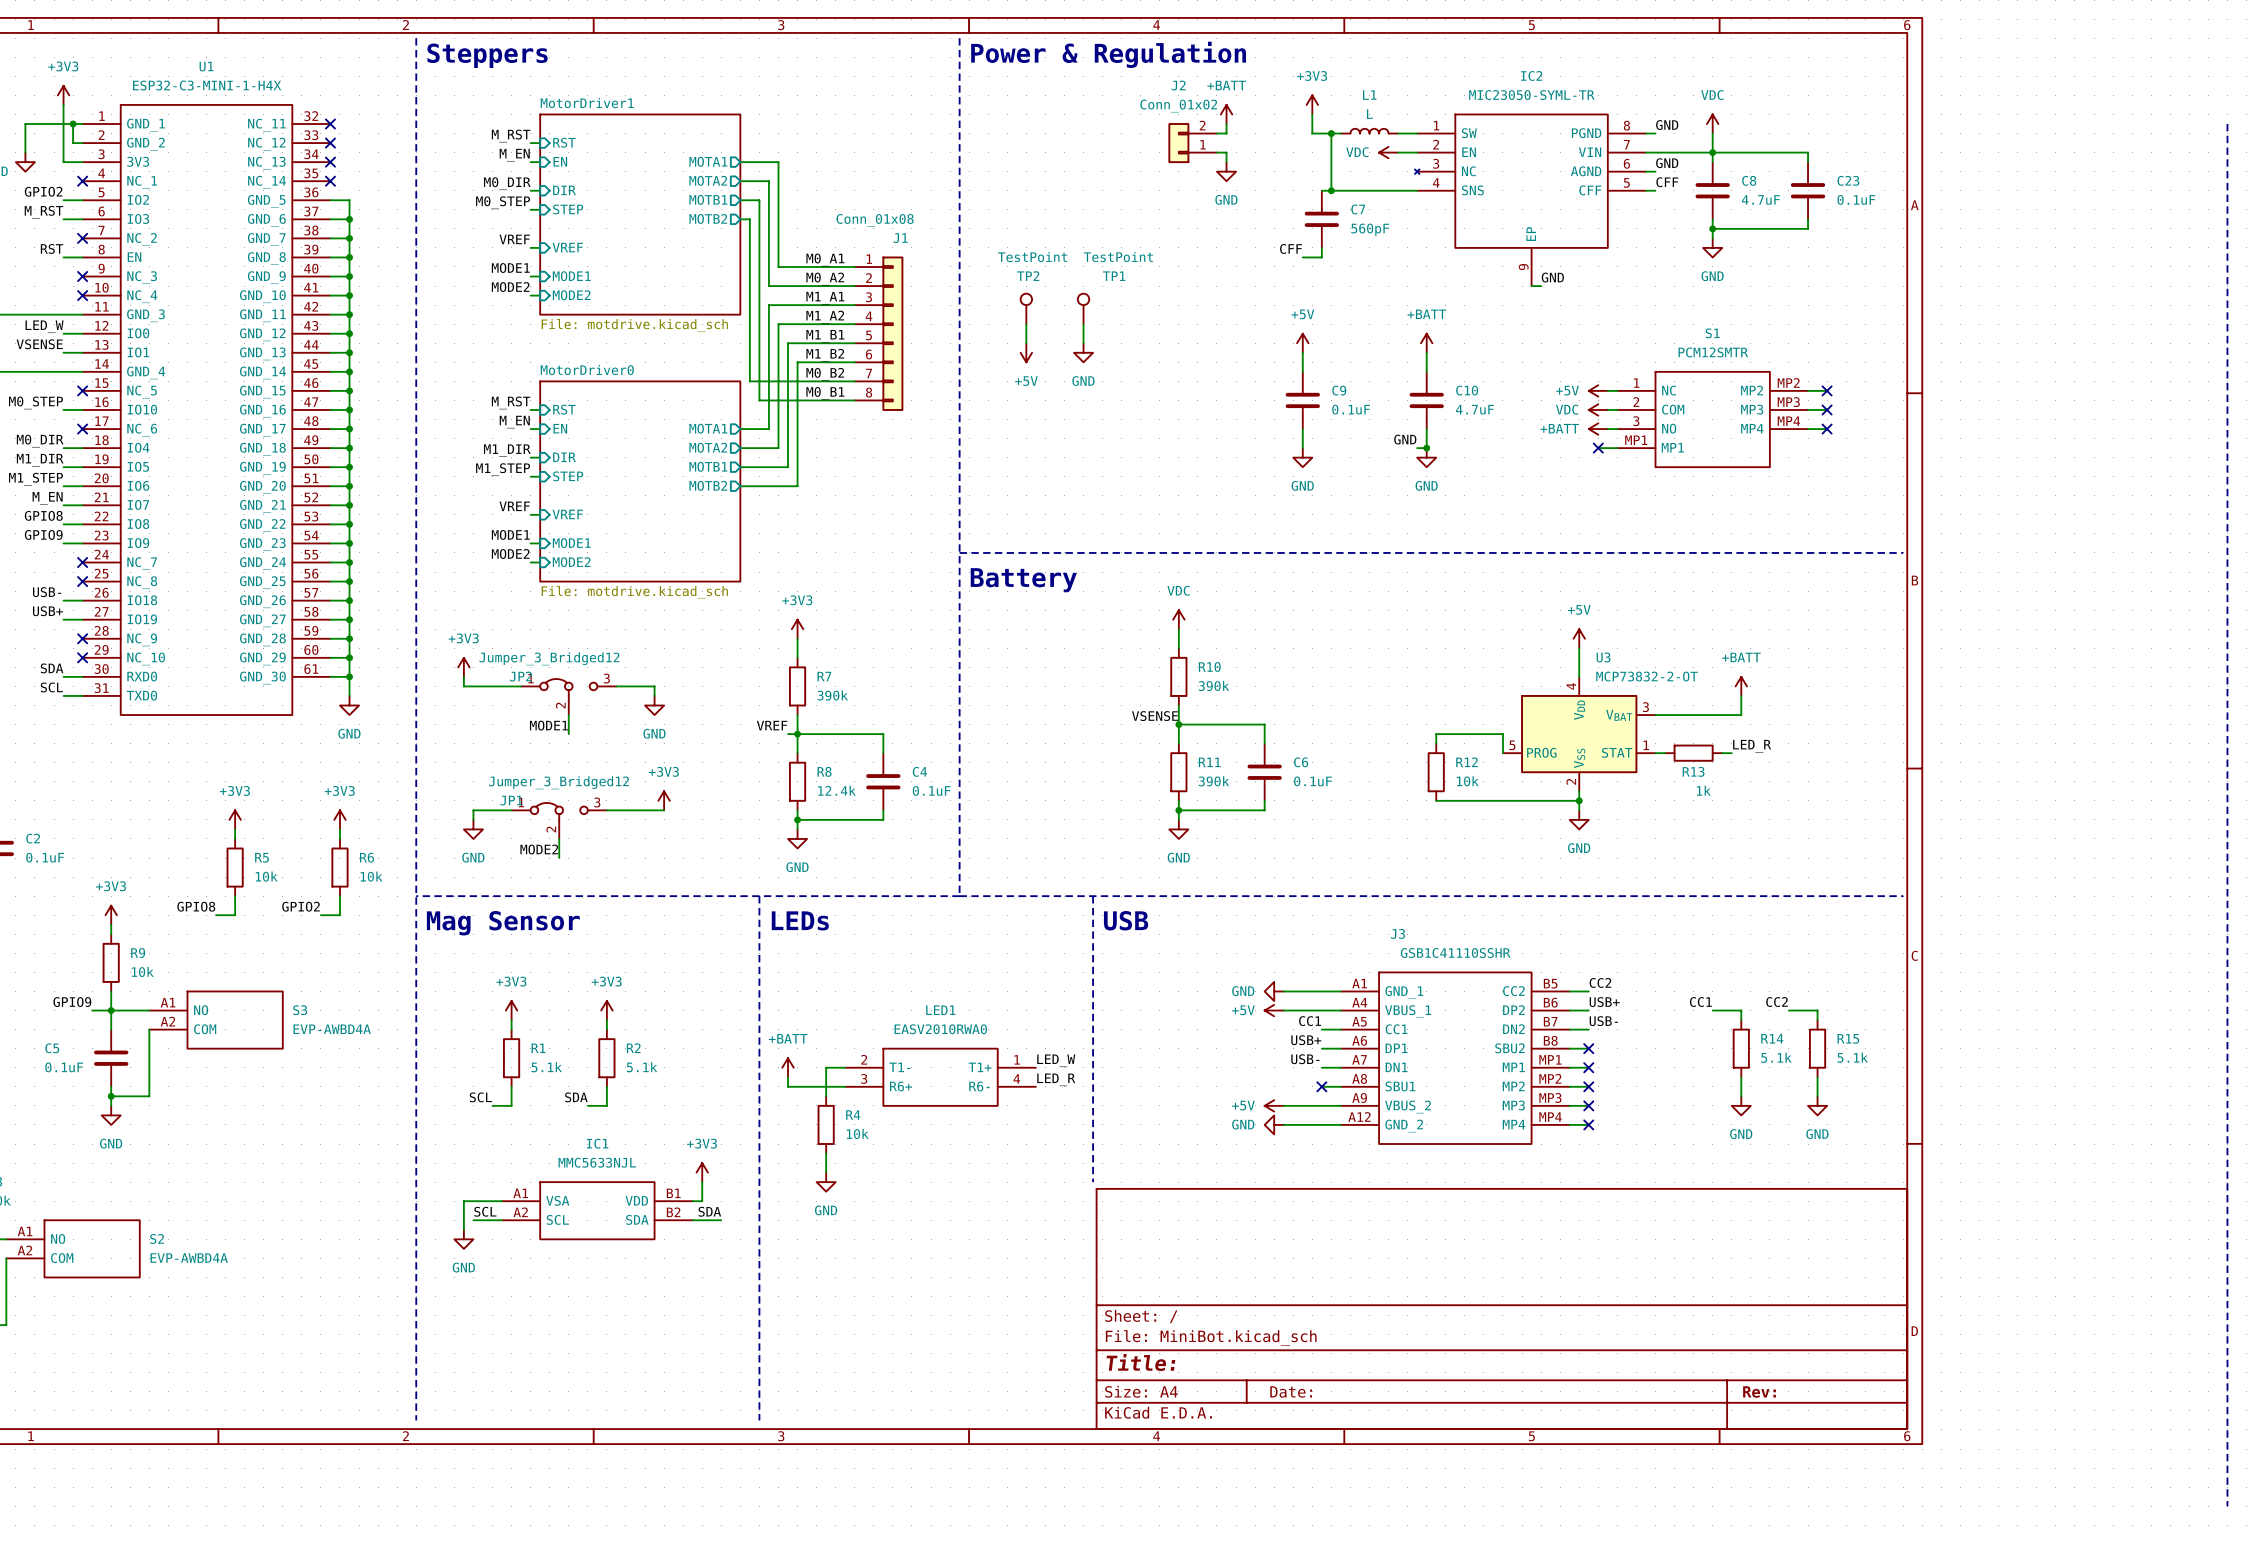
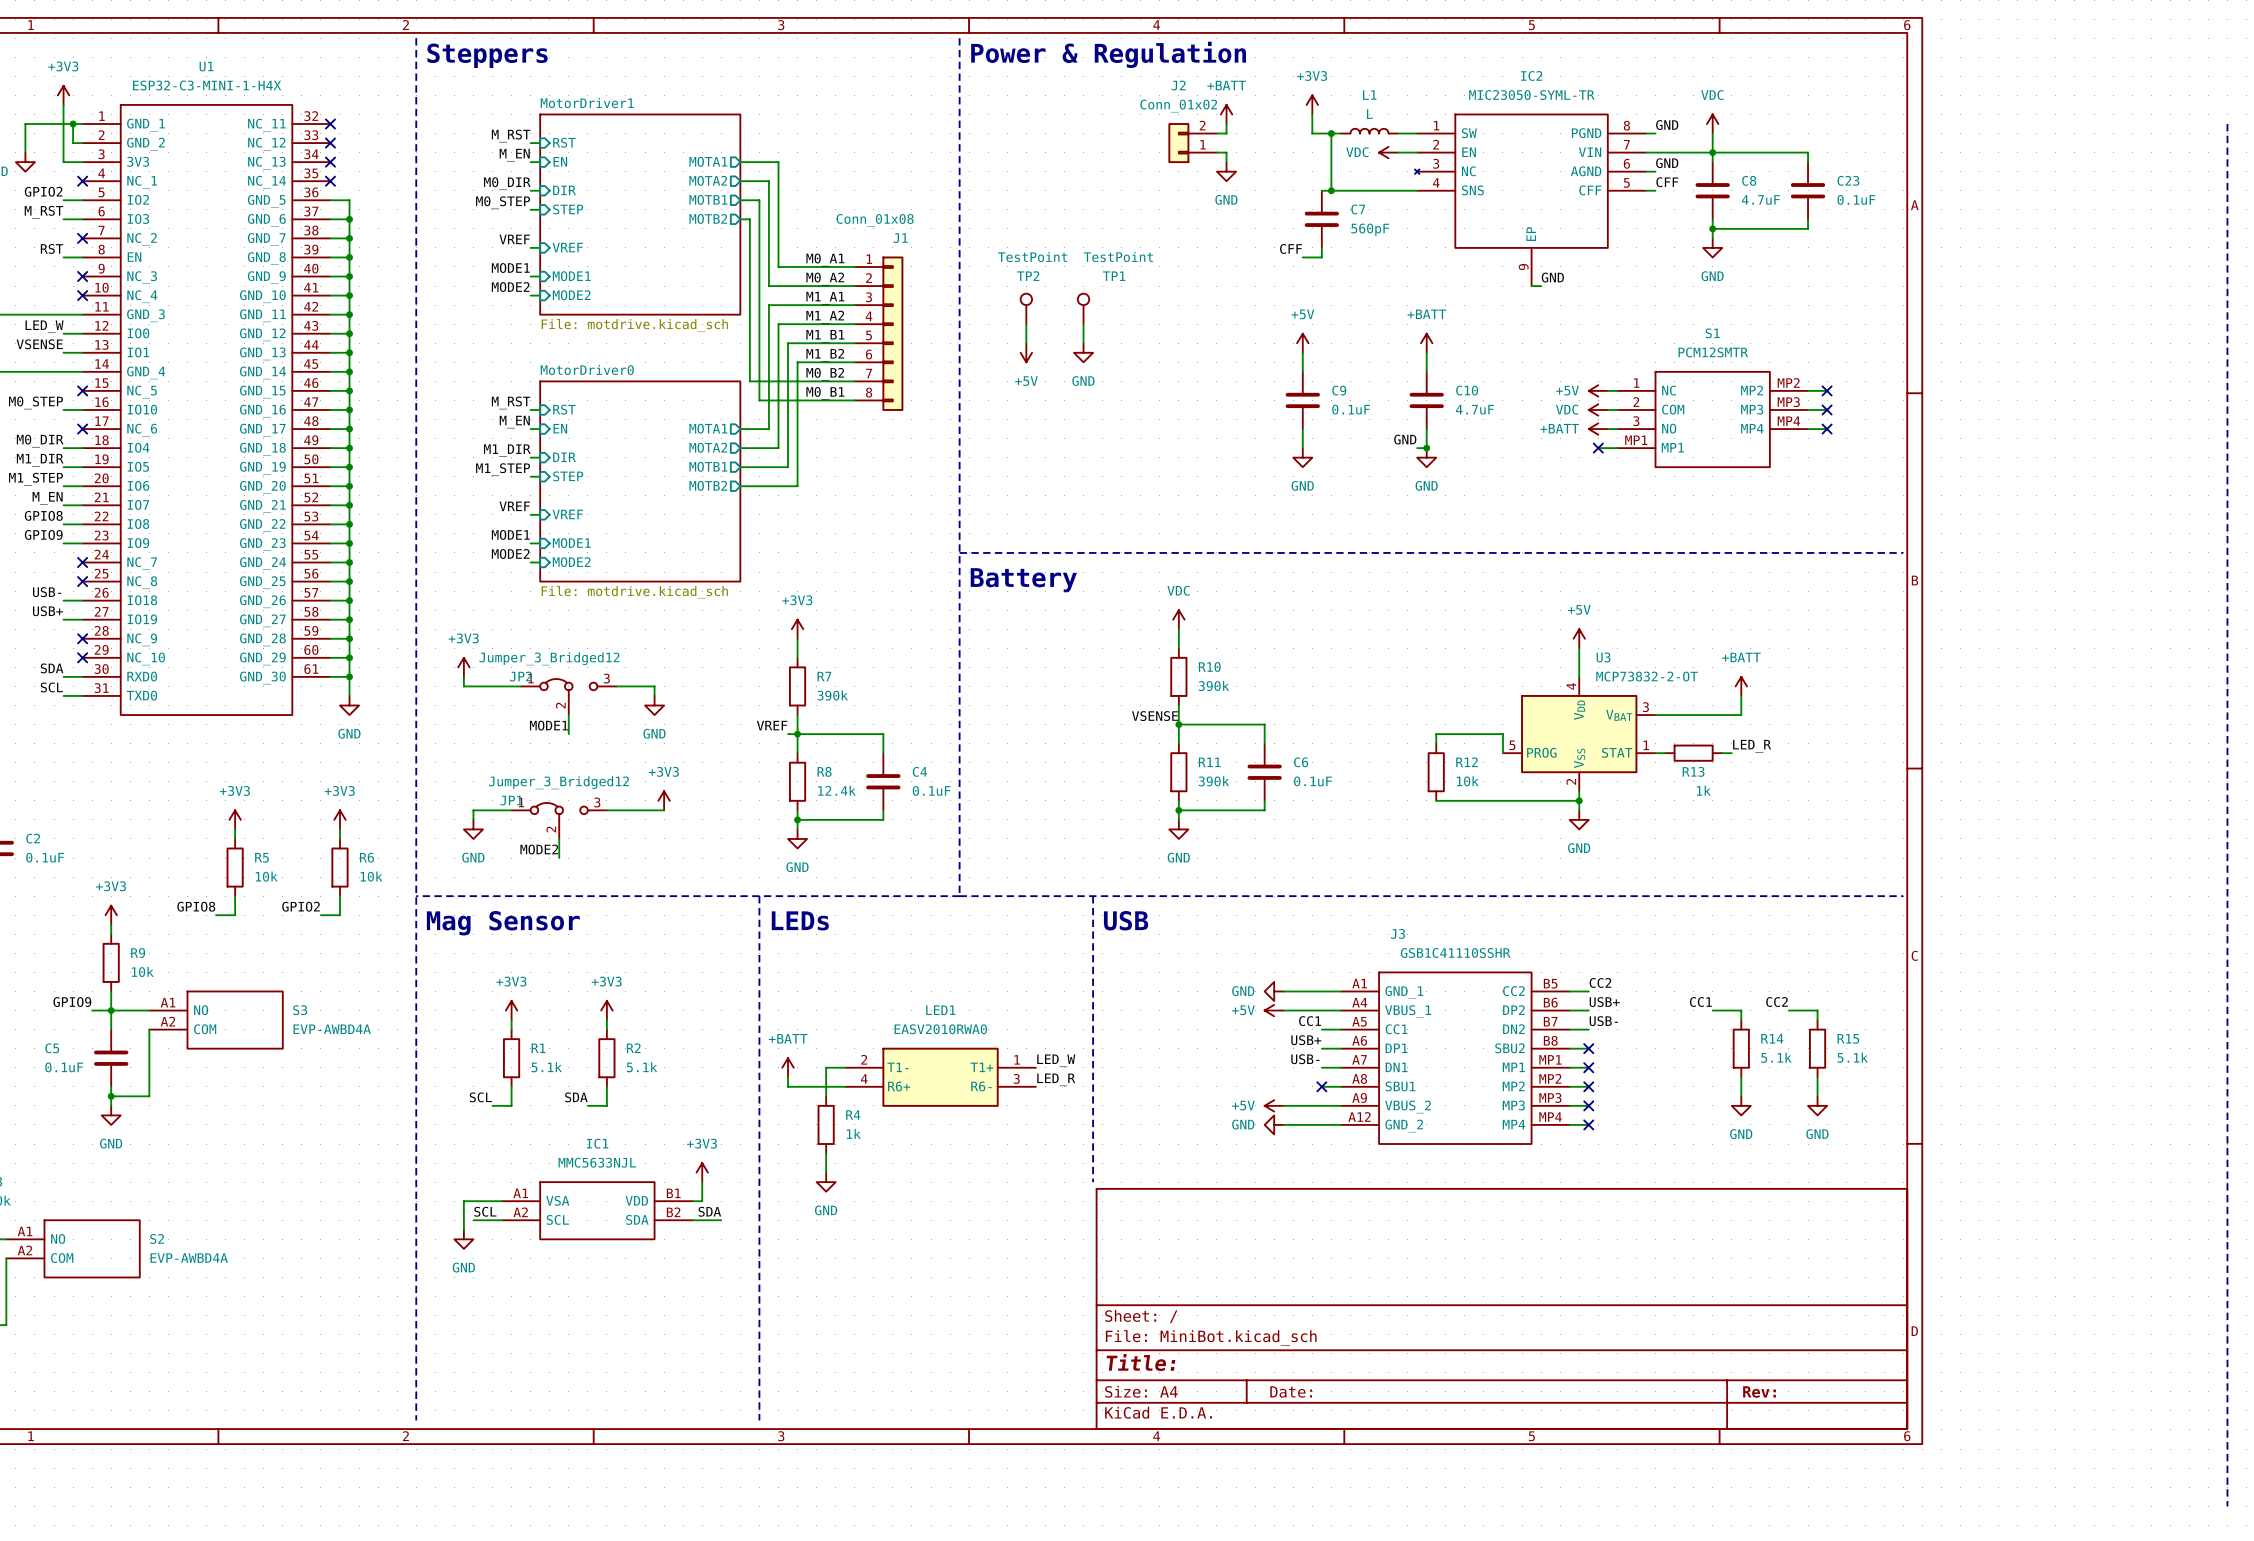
LED1 symbol: [845, 1048, 1036, 1107] -> [845, 1047, 1036, 1107]
R4 value: 10k (857, 1134) -> 1k (853, 1133)

